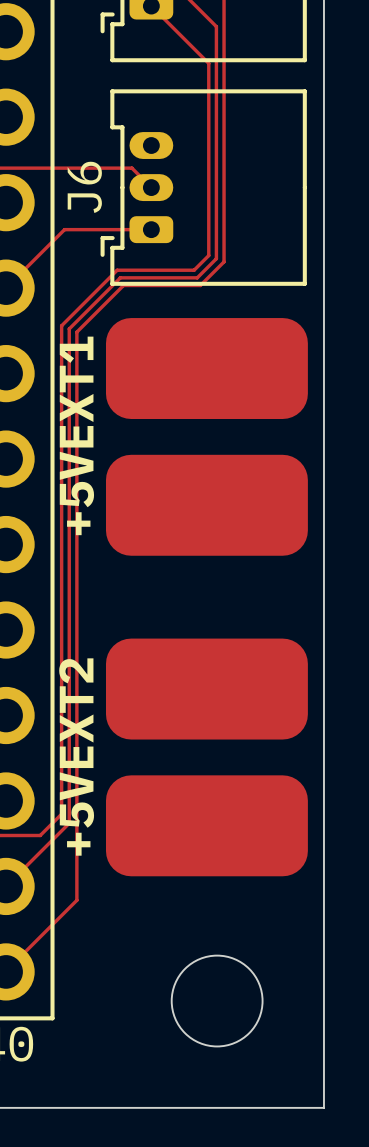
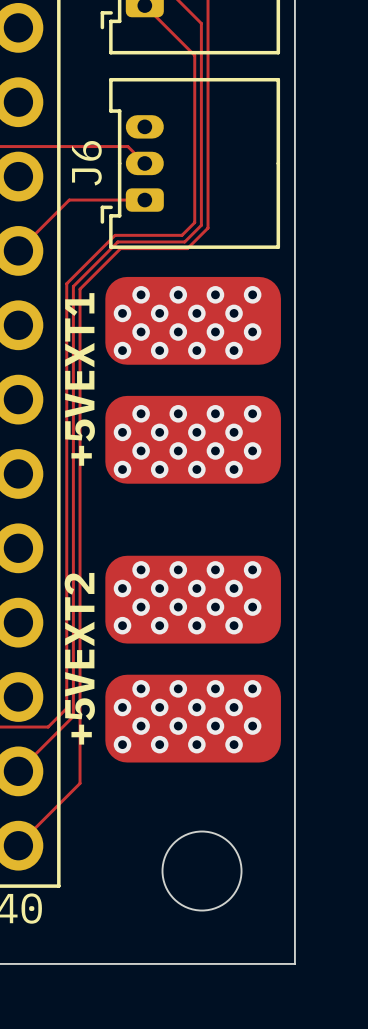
via: none -> (141, 294)
via: none -> (178, 294)
via: none -> (215, 294)
via: none -> (252, 294)
via: none -> (122, 313)
via: none -> (159, 313)
via: none -> (196, 313)
via: none -> (234, 313)
via: none -> (141, 332)
via: none -> (178, 332)
via: none -> (215, 332)
via: none -> (252, 332)
via: none -> (122, 350)
via: none -> (159, 350)
via: none -> (196, 350)
via: none -> (234, 350)
via: none -> (141, 413)
via: none -> (178, 413)
via: none -> (215, 413)
via: none -> (252, 413)
via: none -> (122, 432)
via: none -> (159, 432)
via: none -> (196, 432)
via: none -> (234, 432)
via: none -> (141, 450)
via: none -> (178, 450)
via: none -> (215, 450)
via: none -> (252, 450)
via: none -> (122, 469)
via: none -> (159, 469)
via: none -> (196, 469)
via: none -> (234, 469)
via: none -> (141, 569)
via: none -> (178, 569)
via: none -> (215, 569)
via: none -> (252, 569)
via: none -> (122, 588)
via: none -> (159, 588)
via: none -> (196, 588)
via: none -> (234, 588)
via: none -> (141, 607)
via: none -> (178, 607)
via: none -> (215, 607)
via: none -> (252, 607)
via: none -> (122, 625)
via: none -> (159, 625)
via: none -> (196, 625)
via: none -> (234, 625)
via: none -> (141, 688)
via: none -> (178, 688)
via: none -> (215, 688)
via: none -> (252, 688)
via: none -> (122, 707)
via: none -> (159, 707)
via: none -> (196, 707)
via: none -> (234, 707)
via: none -> (141, 726)
via: none -> (178, 726)
via: none -> (215, 726)
via: none -> (252, 726)
via: none -> (122, 744)
via: none -> (159, 744)
via: none -> (196, 744)
via: none -> (234, 744)

